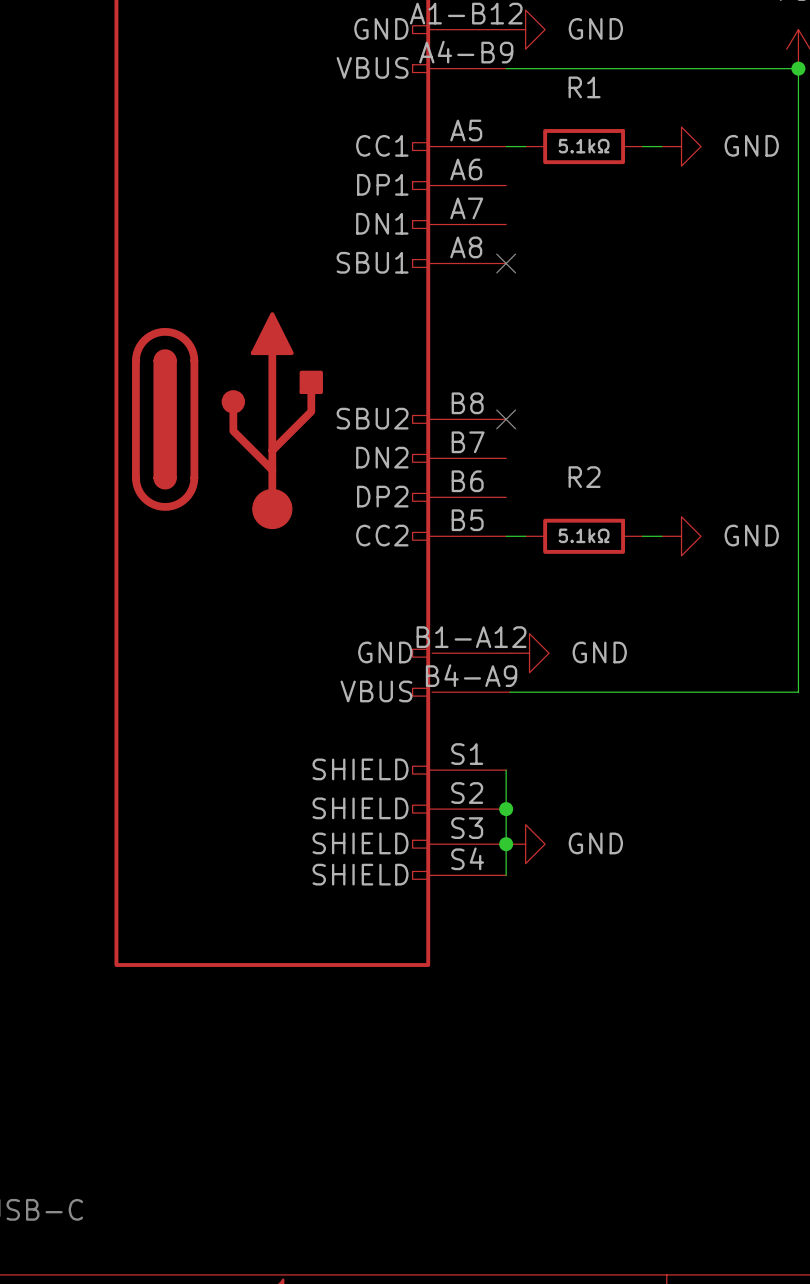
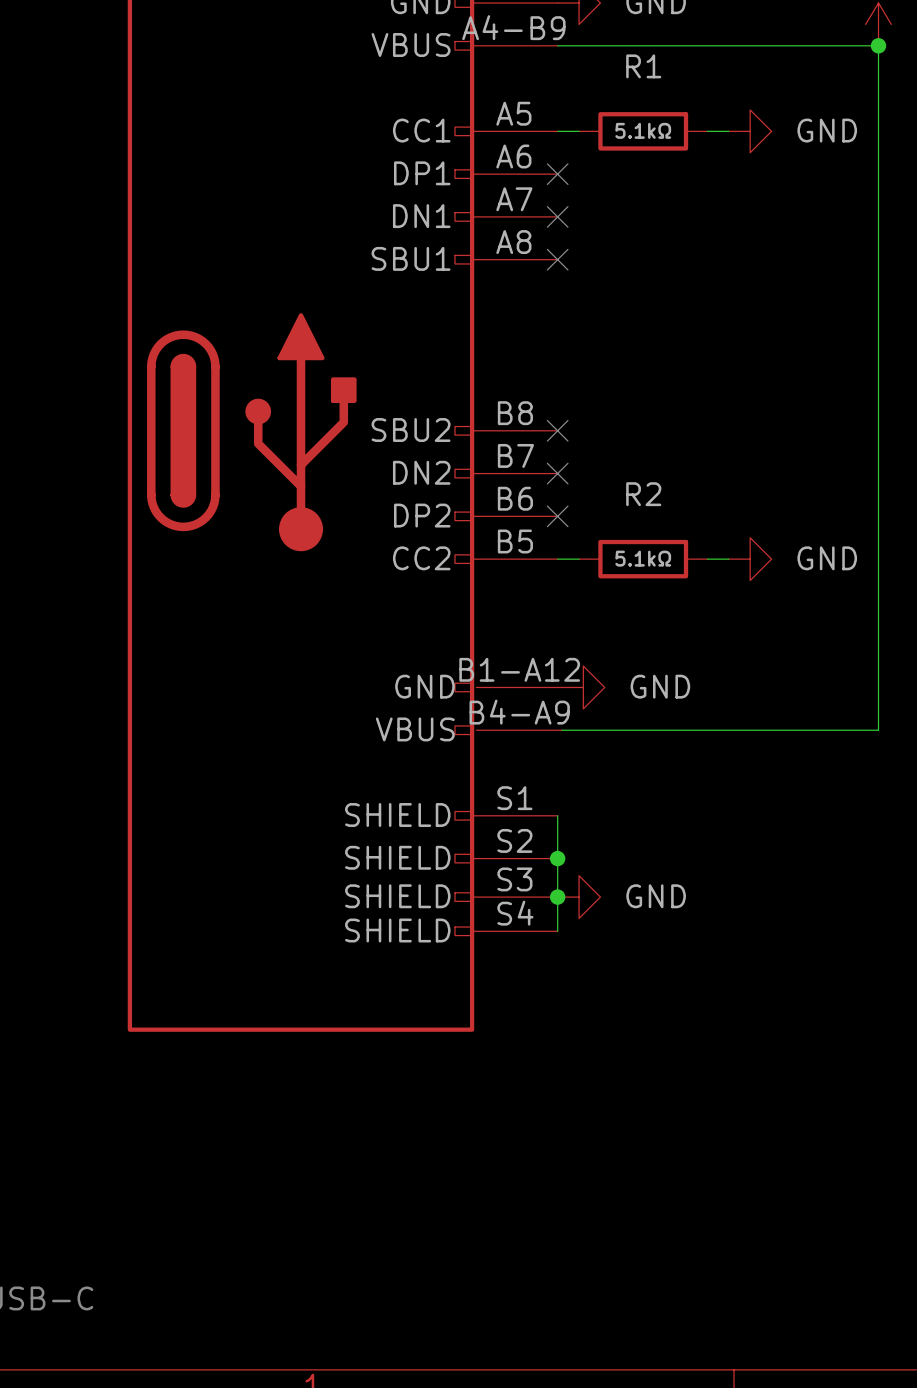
no-connect mark: none -> (557, 174)
no-connect mark: none -> (557, 216)
no-connect mark: none -> (557, 473)
no-connect mark: none -> (557, 516)

